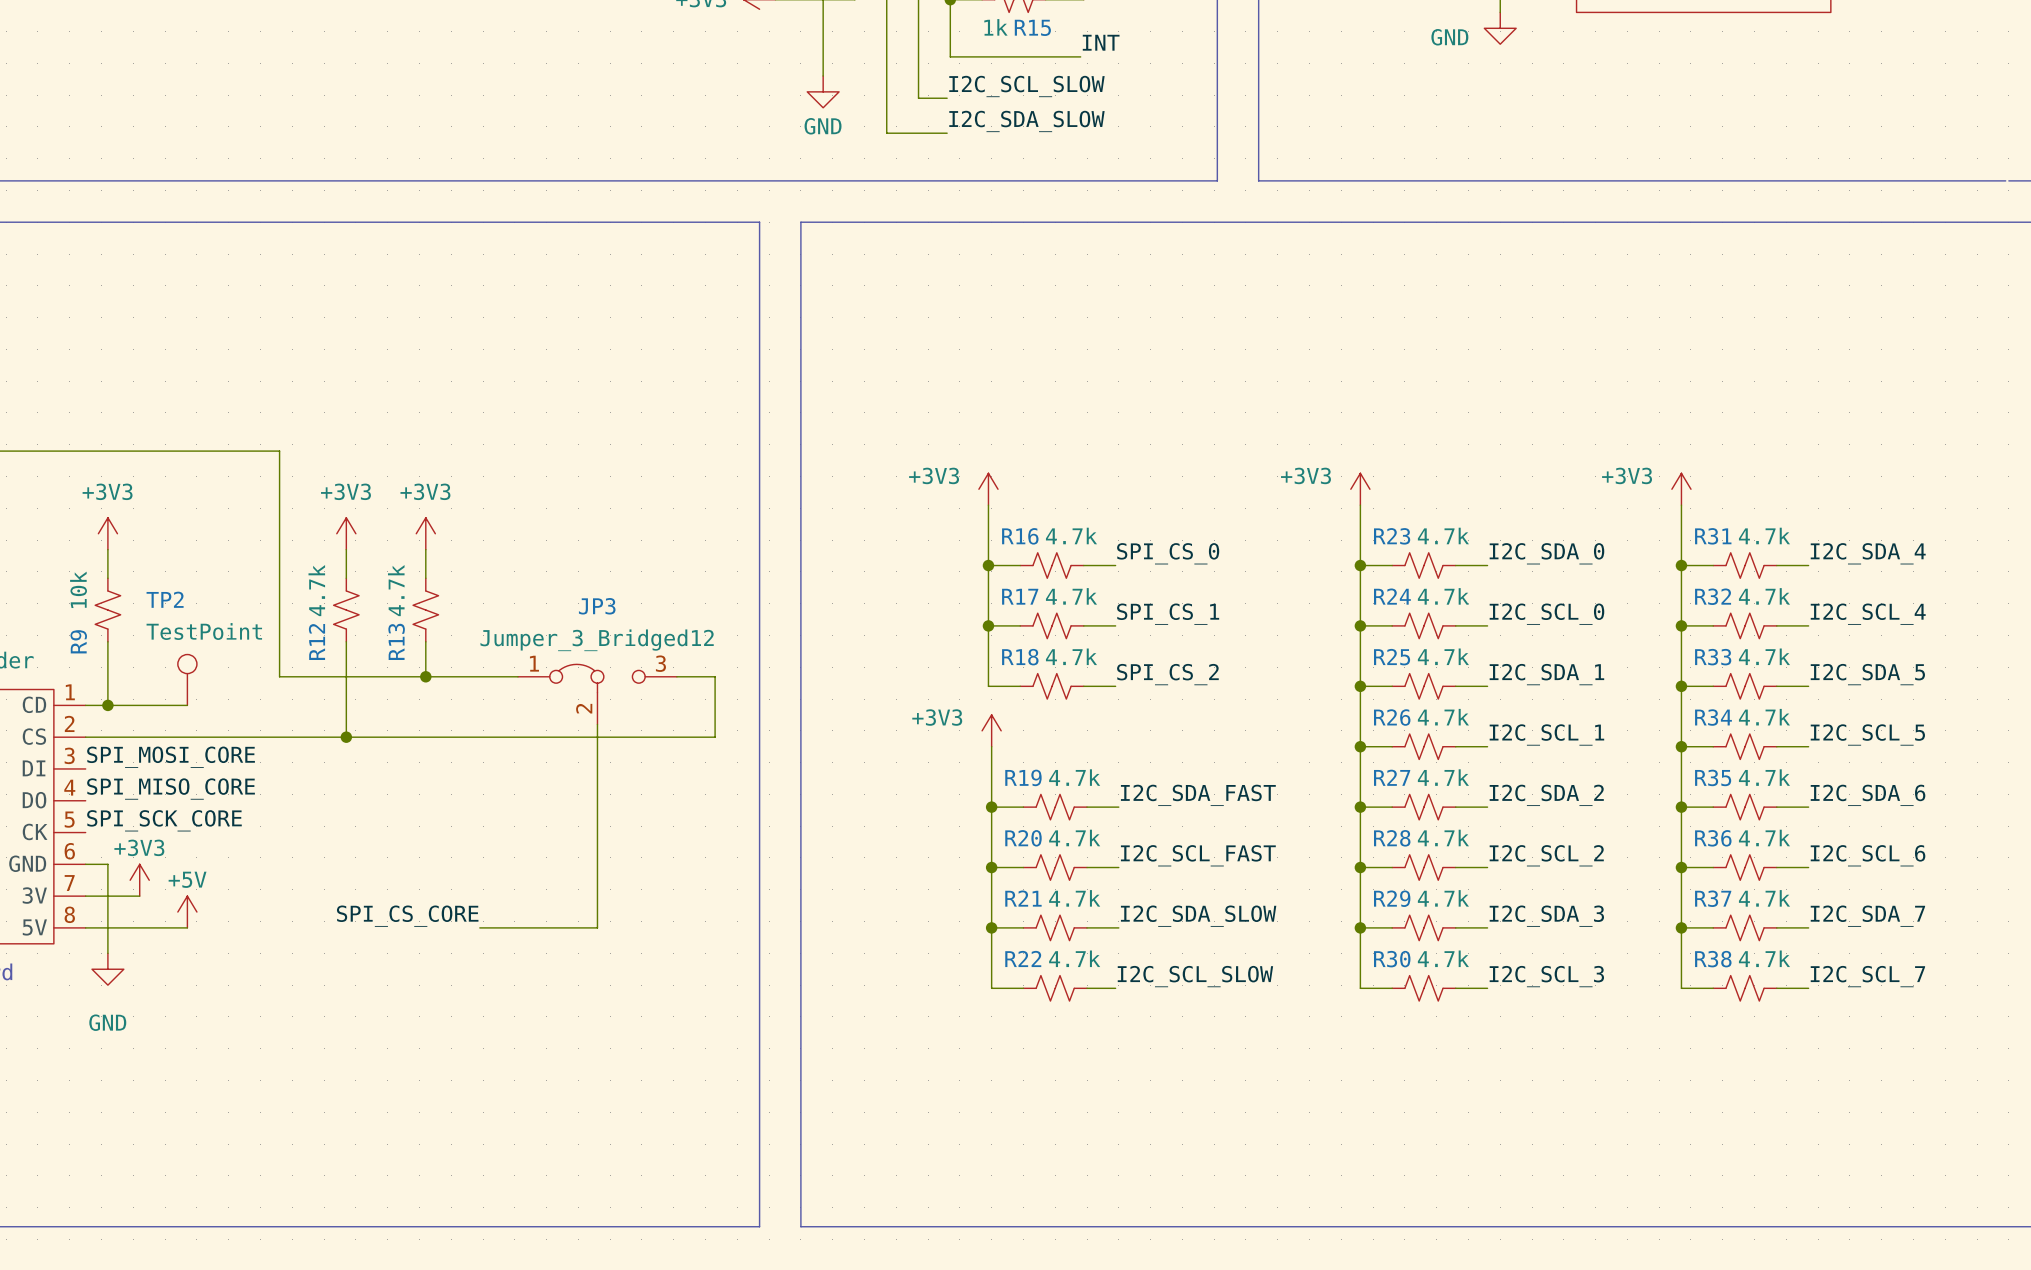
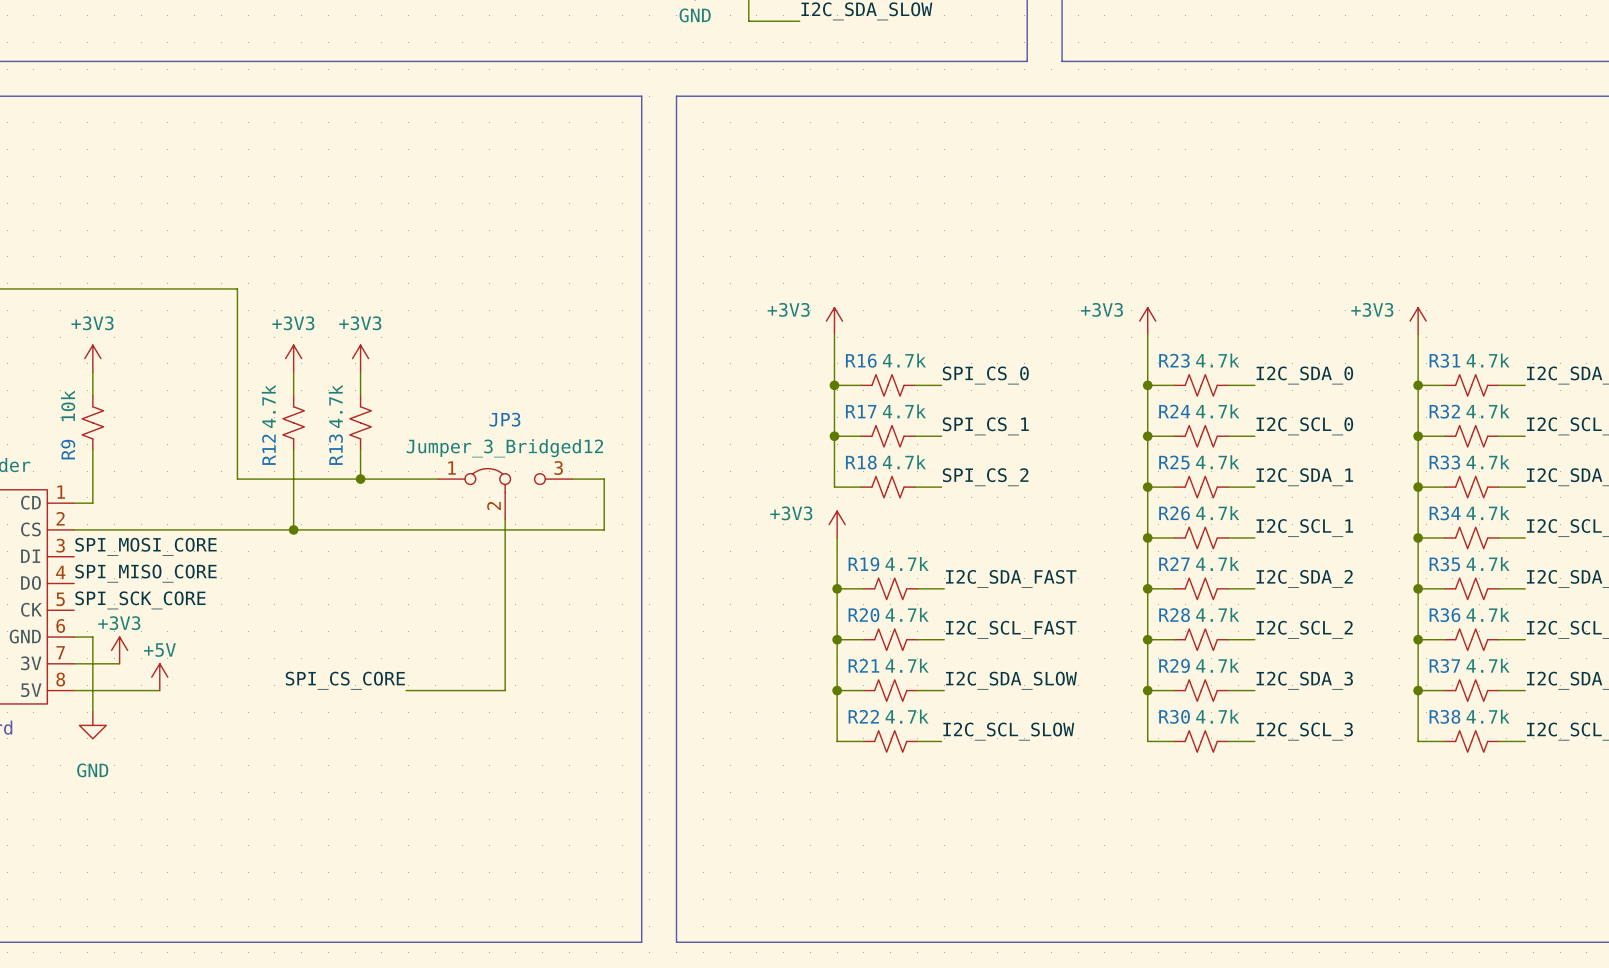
TP2: TestPoint (187, 679) -> none
wire: (107, 705) (187, 705) -> none
junction: (107, 705) -> none

